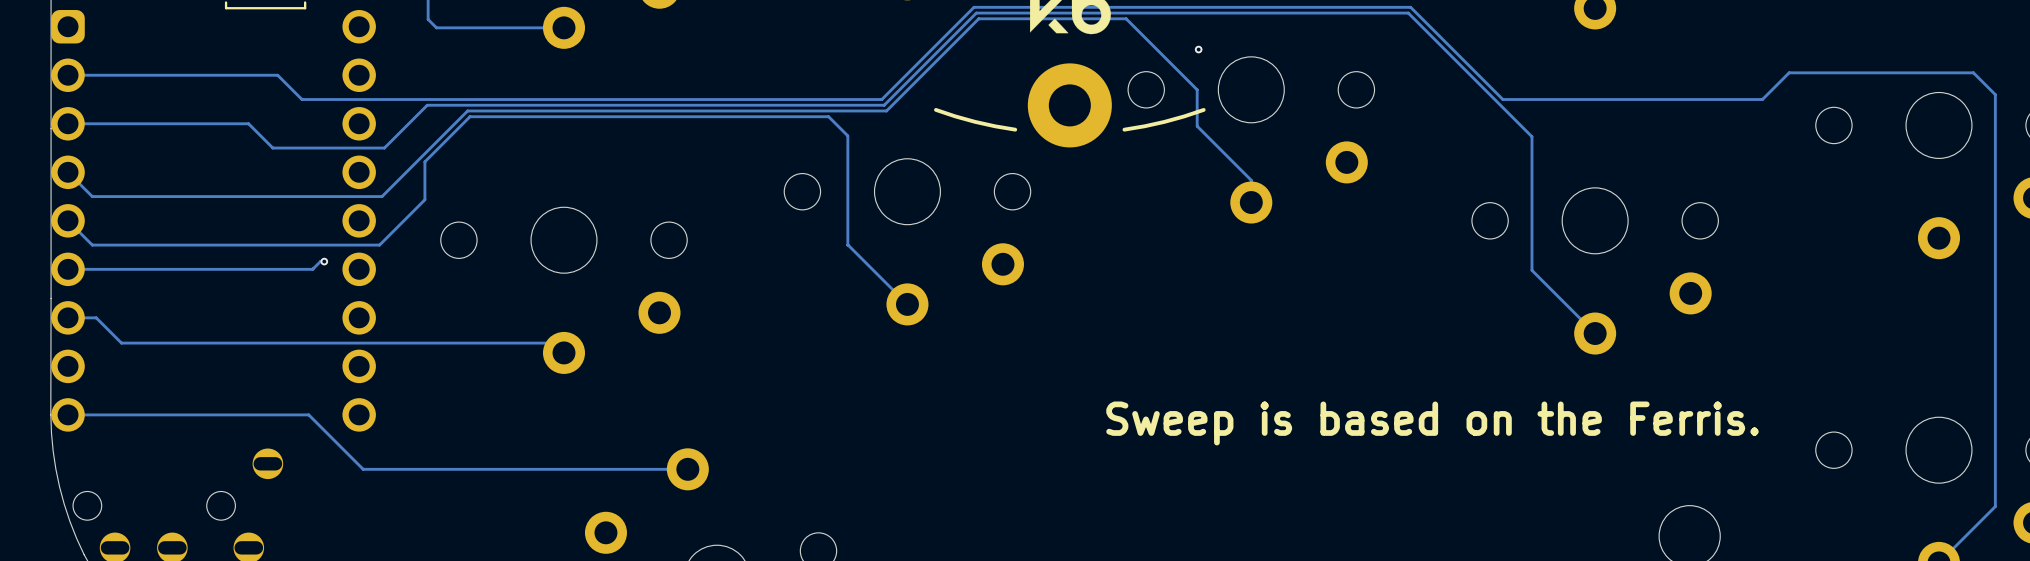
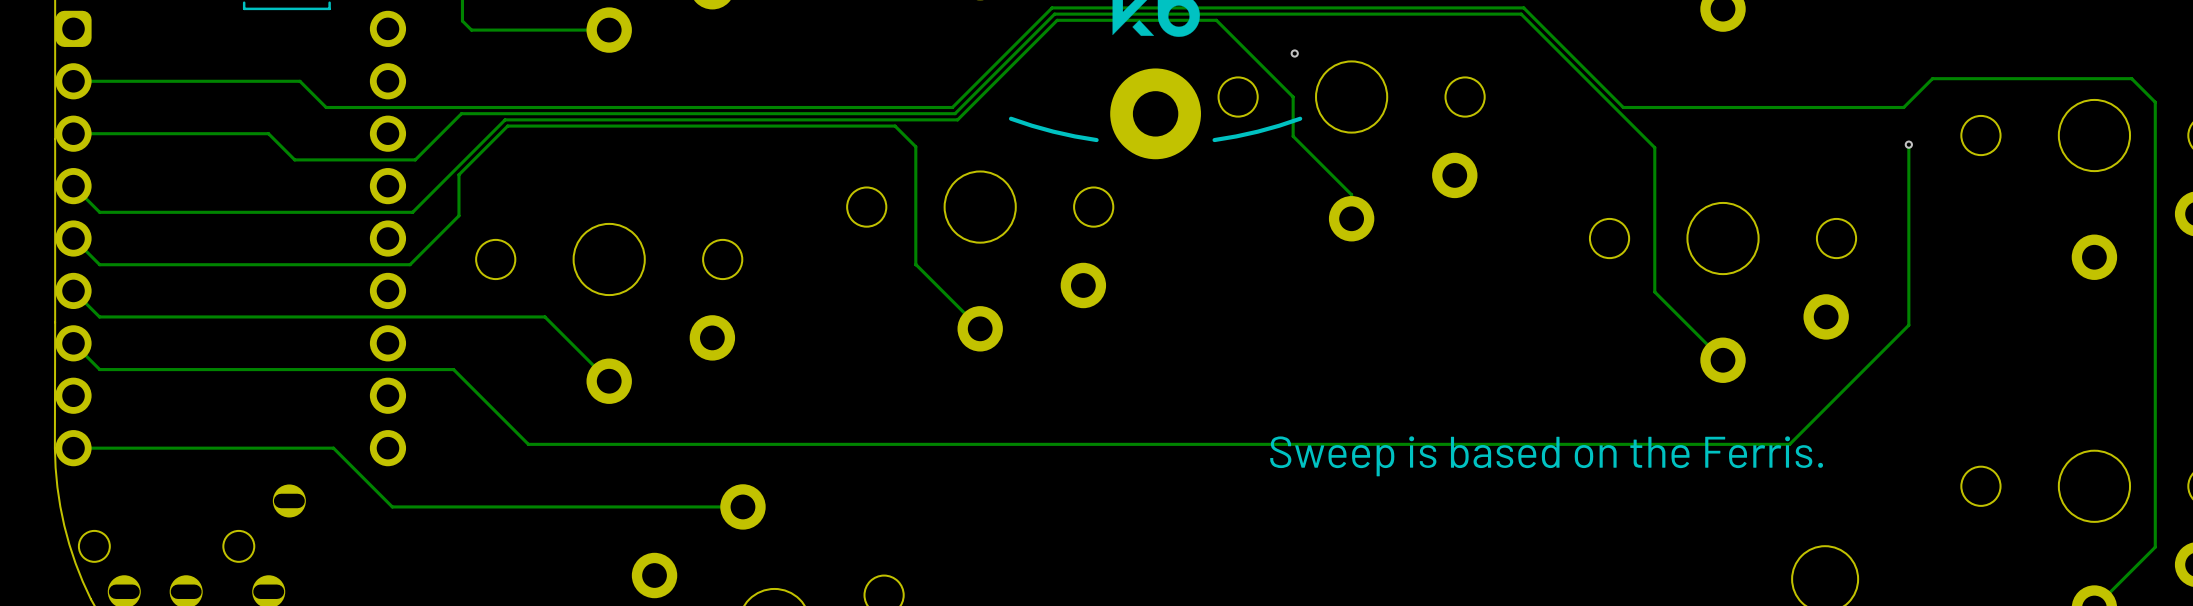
track: none -> (1908, 144) (1908, 325) (1789, 444) (528, 444) (453, 369) (99, 369) (73, 343)
via: none -> (1908, 144)
track: (324, 261) (320, 261) (312, 269) (68, 269) -> none
via: (324, 261) -> none
track: (68, 317) (96, 317) (121, 343) (554, 343) -> (73, 290) (99, 316) (544, 316) (598, 370)

